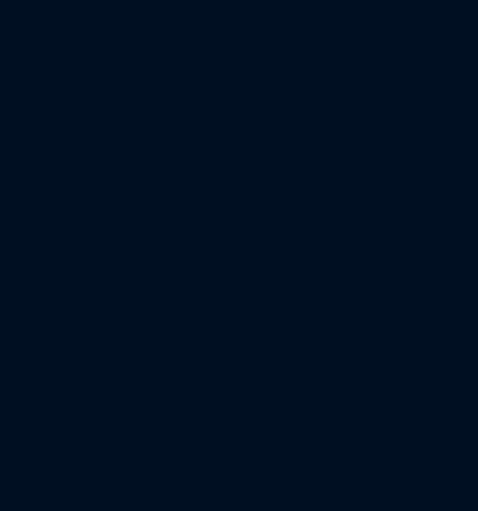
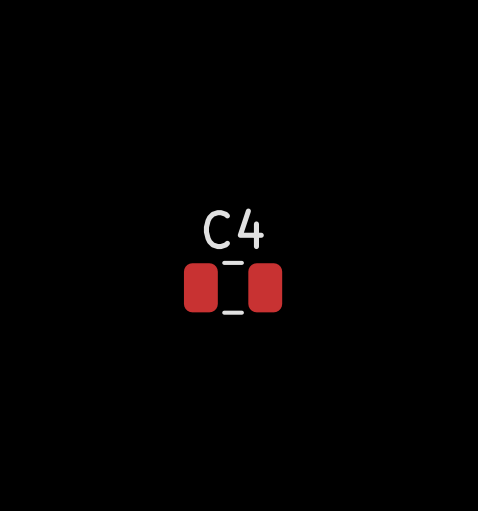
C4: none -> (233, 287)

